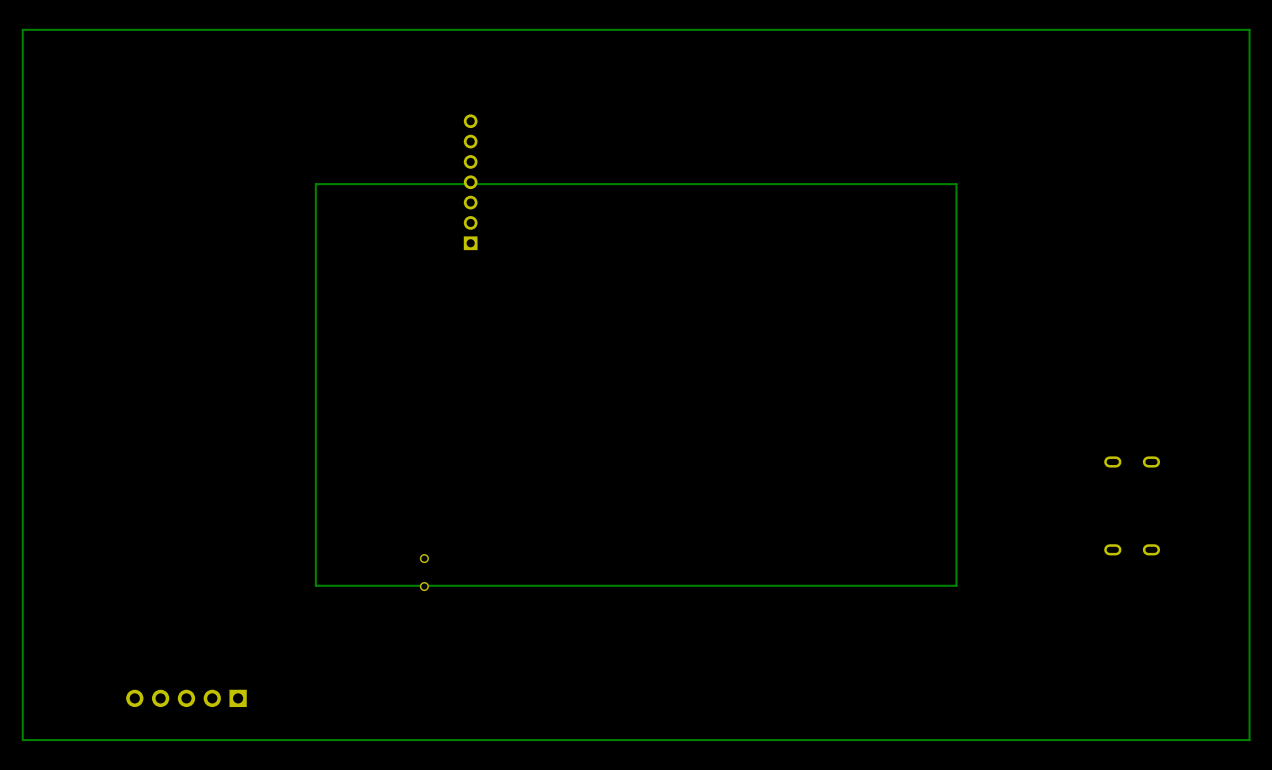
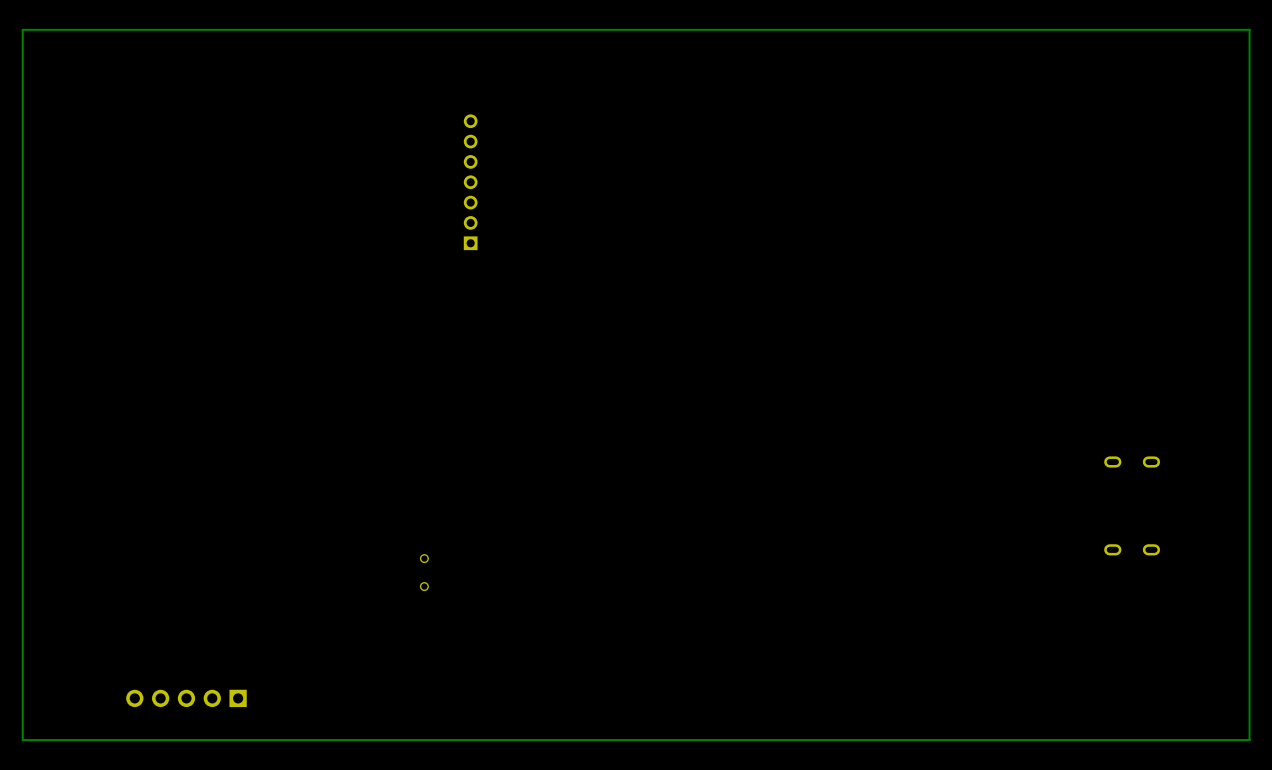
track: (956, 184) (315, 184) (315, 585) (956, 585) (956, 184) -> none

